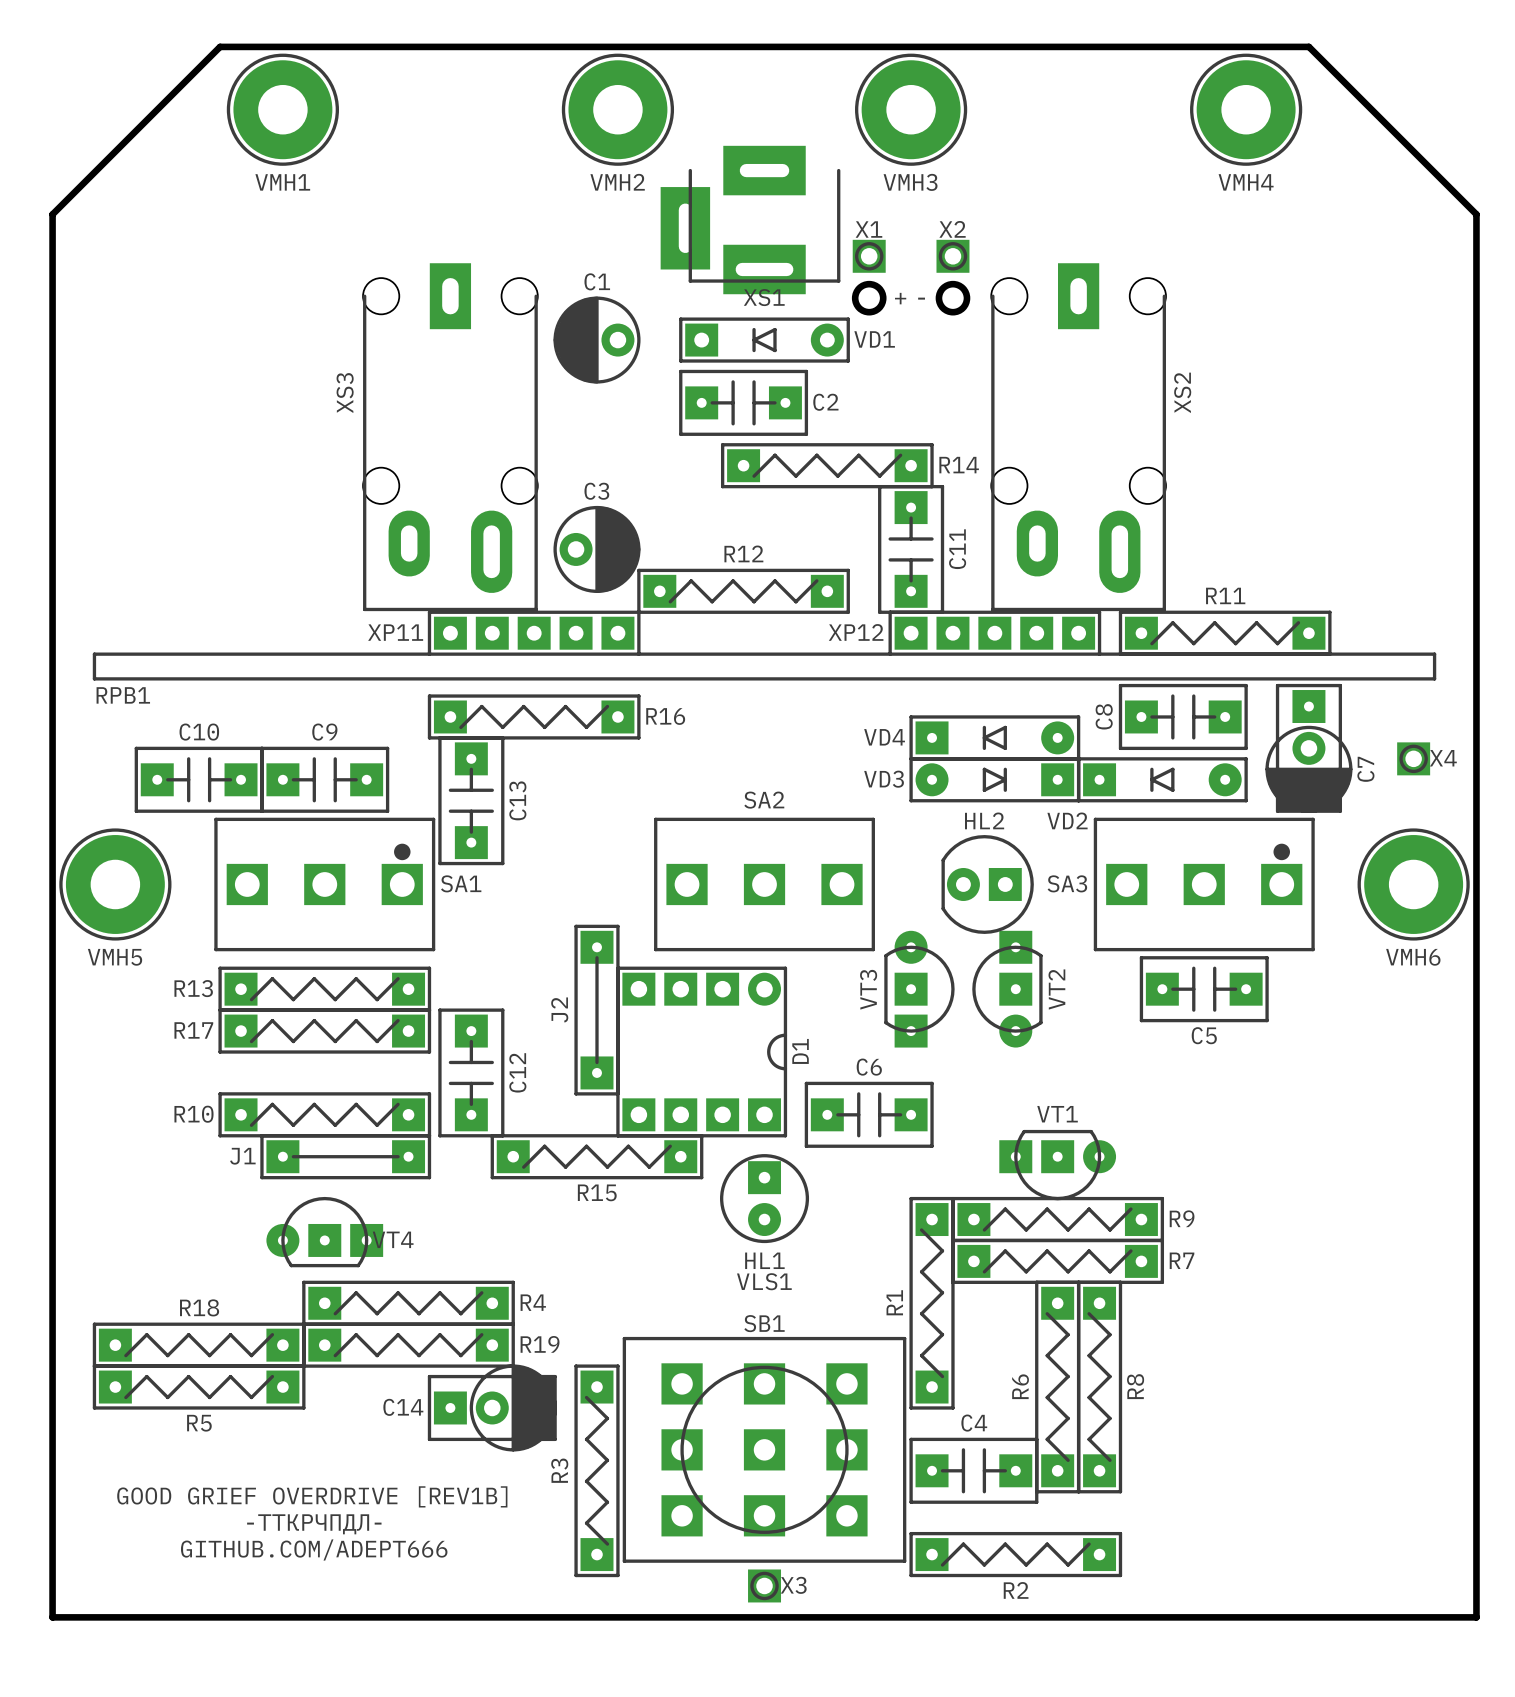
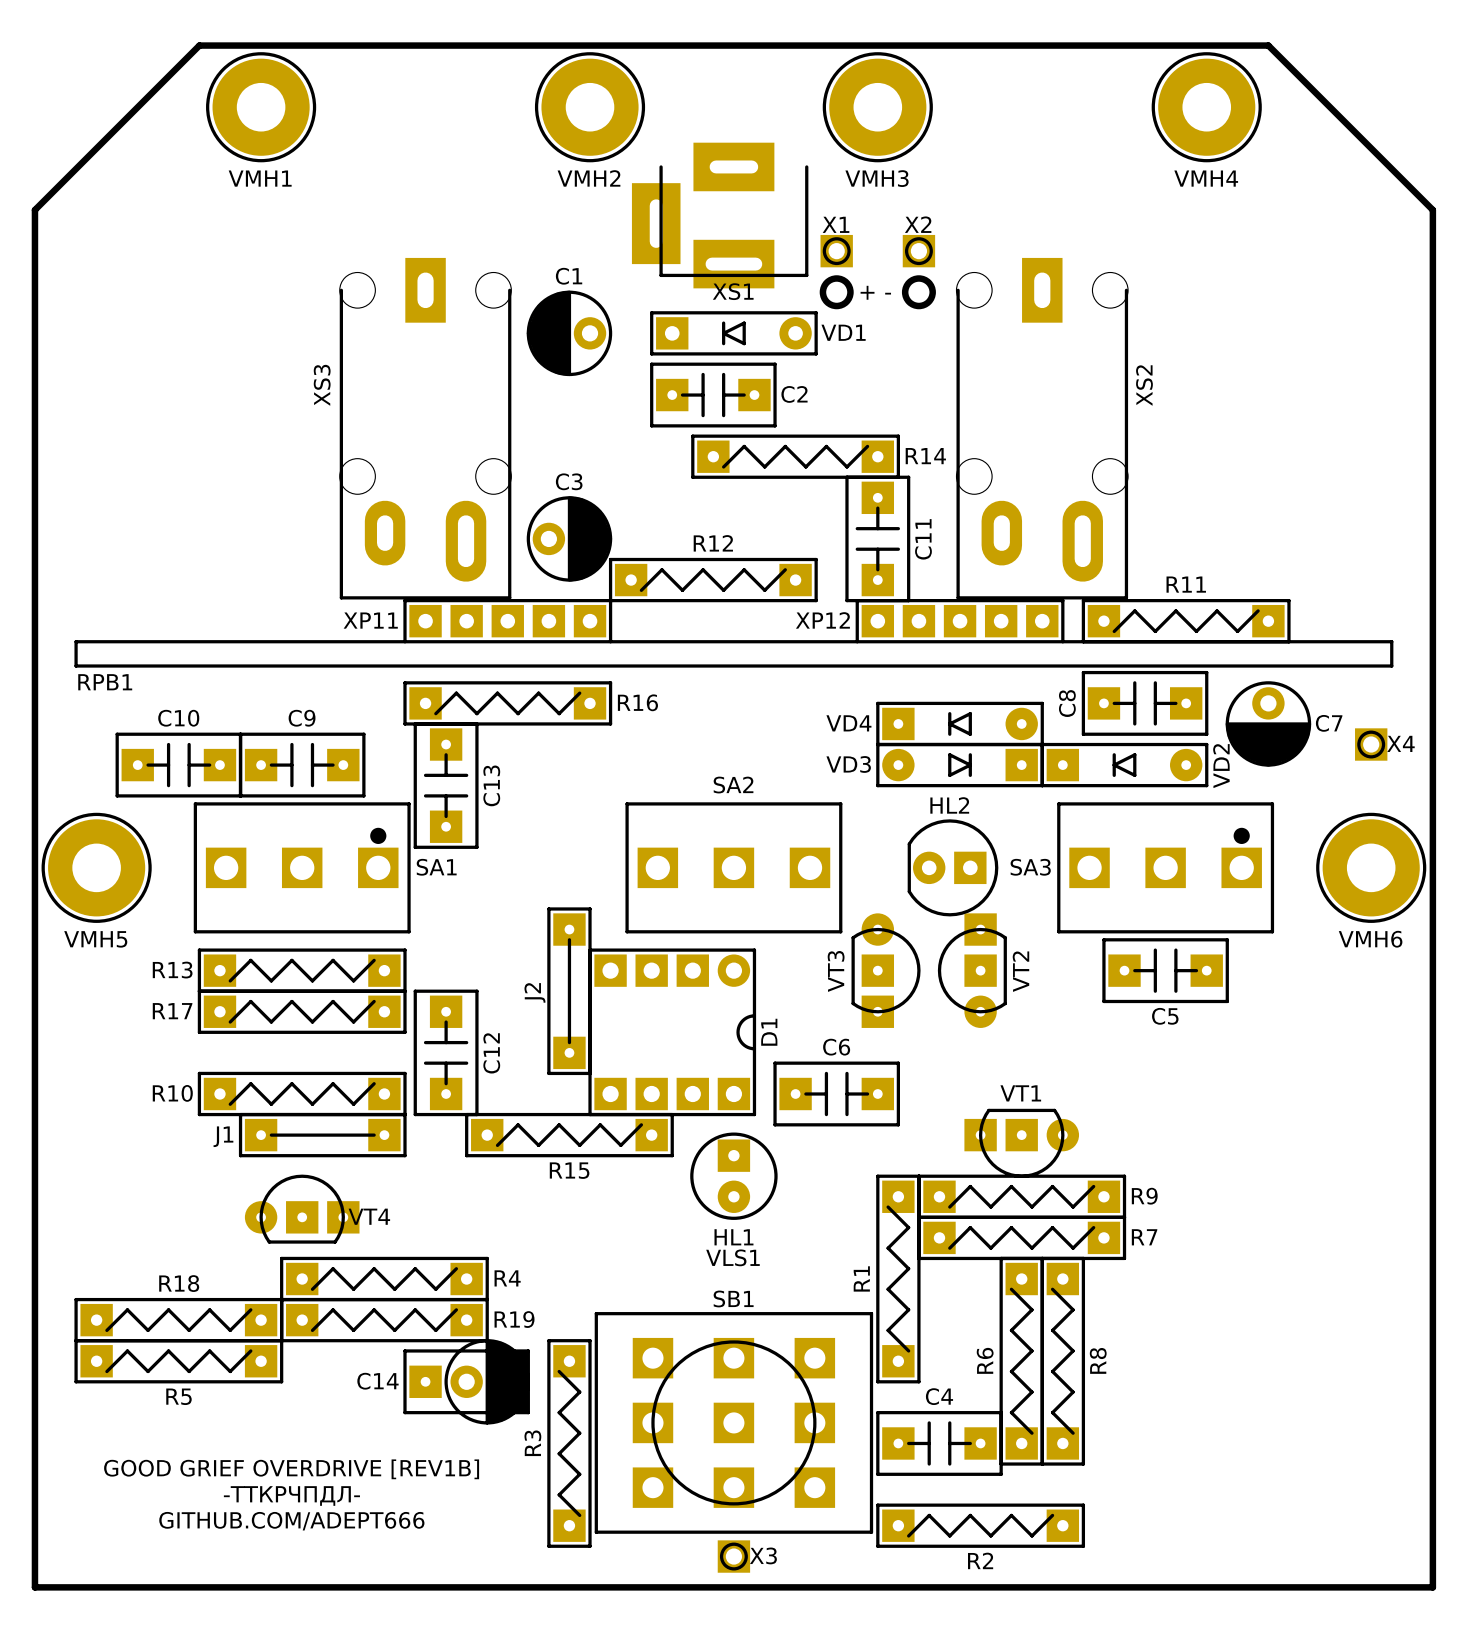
C7 footprint: [1265, 683, 1353, 813] -> [1225, 681, 1312, 767]
VD2 name rotation: 0° (1067, 820) -> 90° counterclockwise (1221, 766)
VD2 name position: VD2 (1067, 820) -> VD2 (1221, 766)

